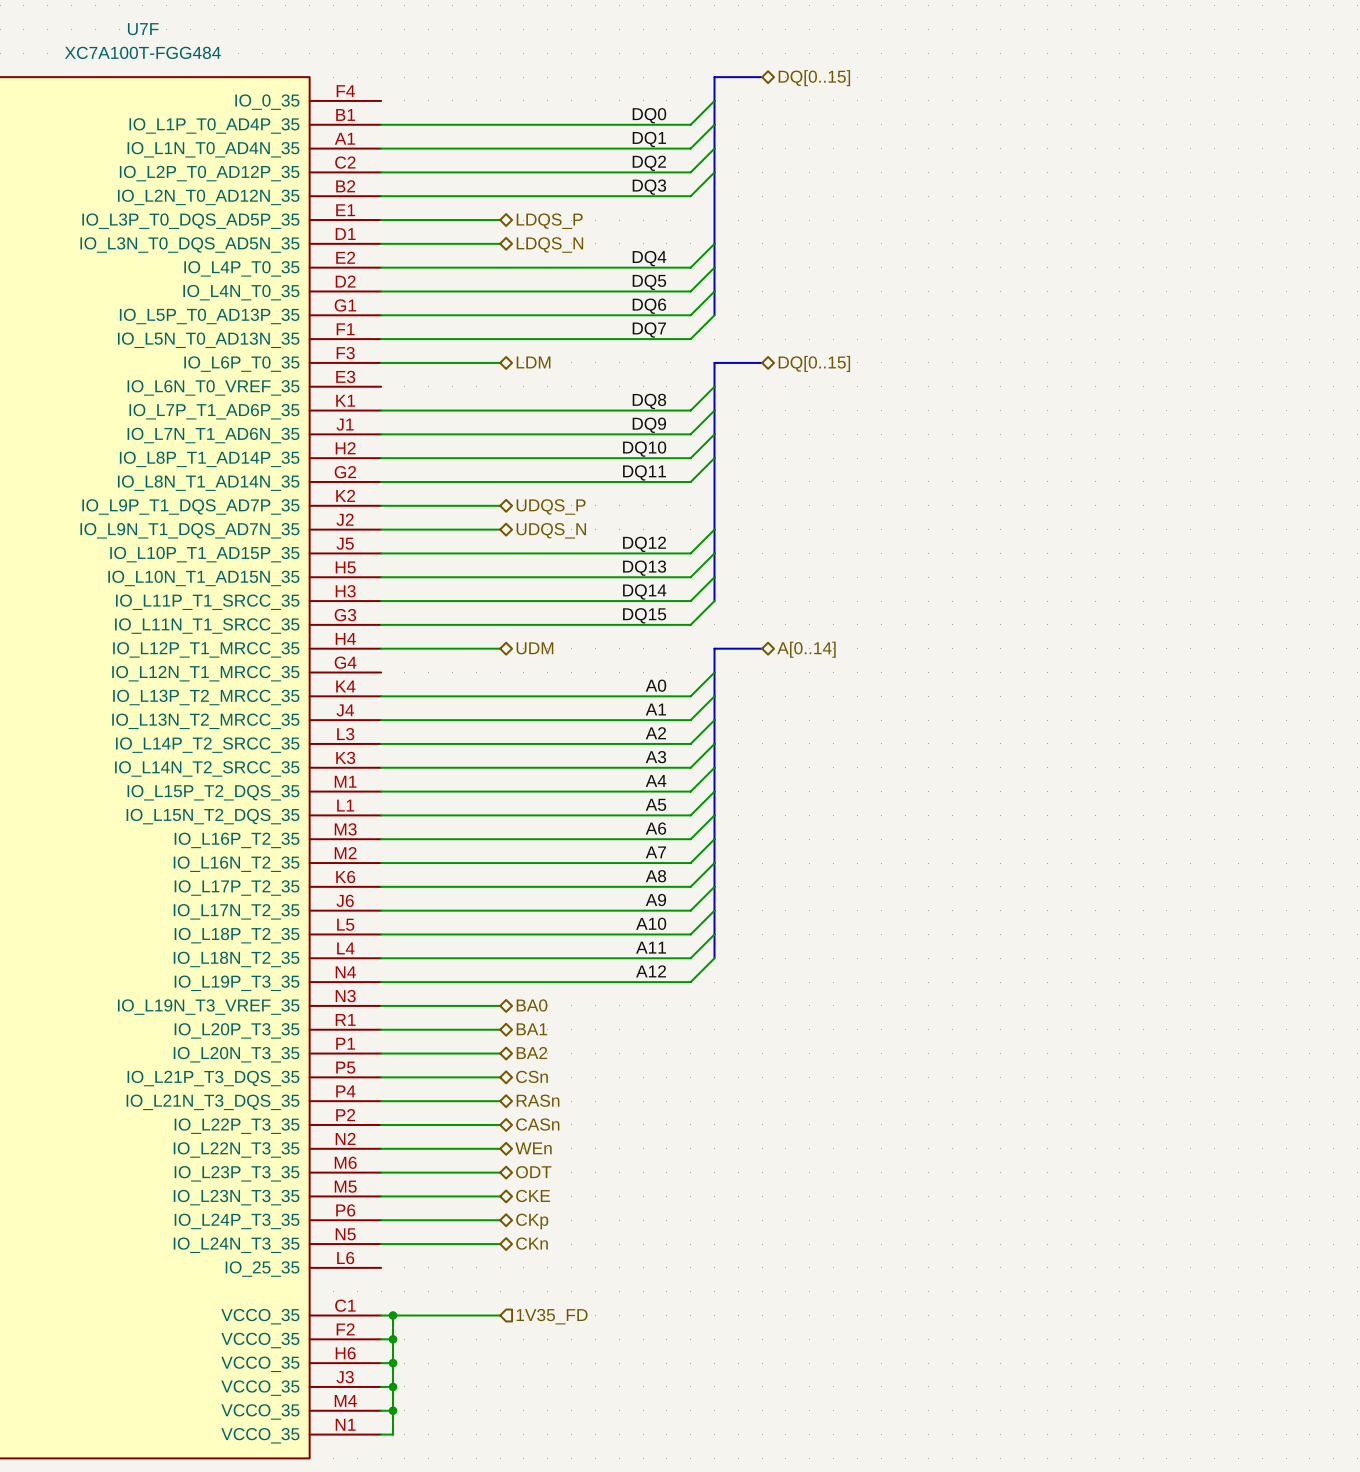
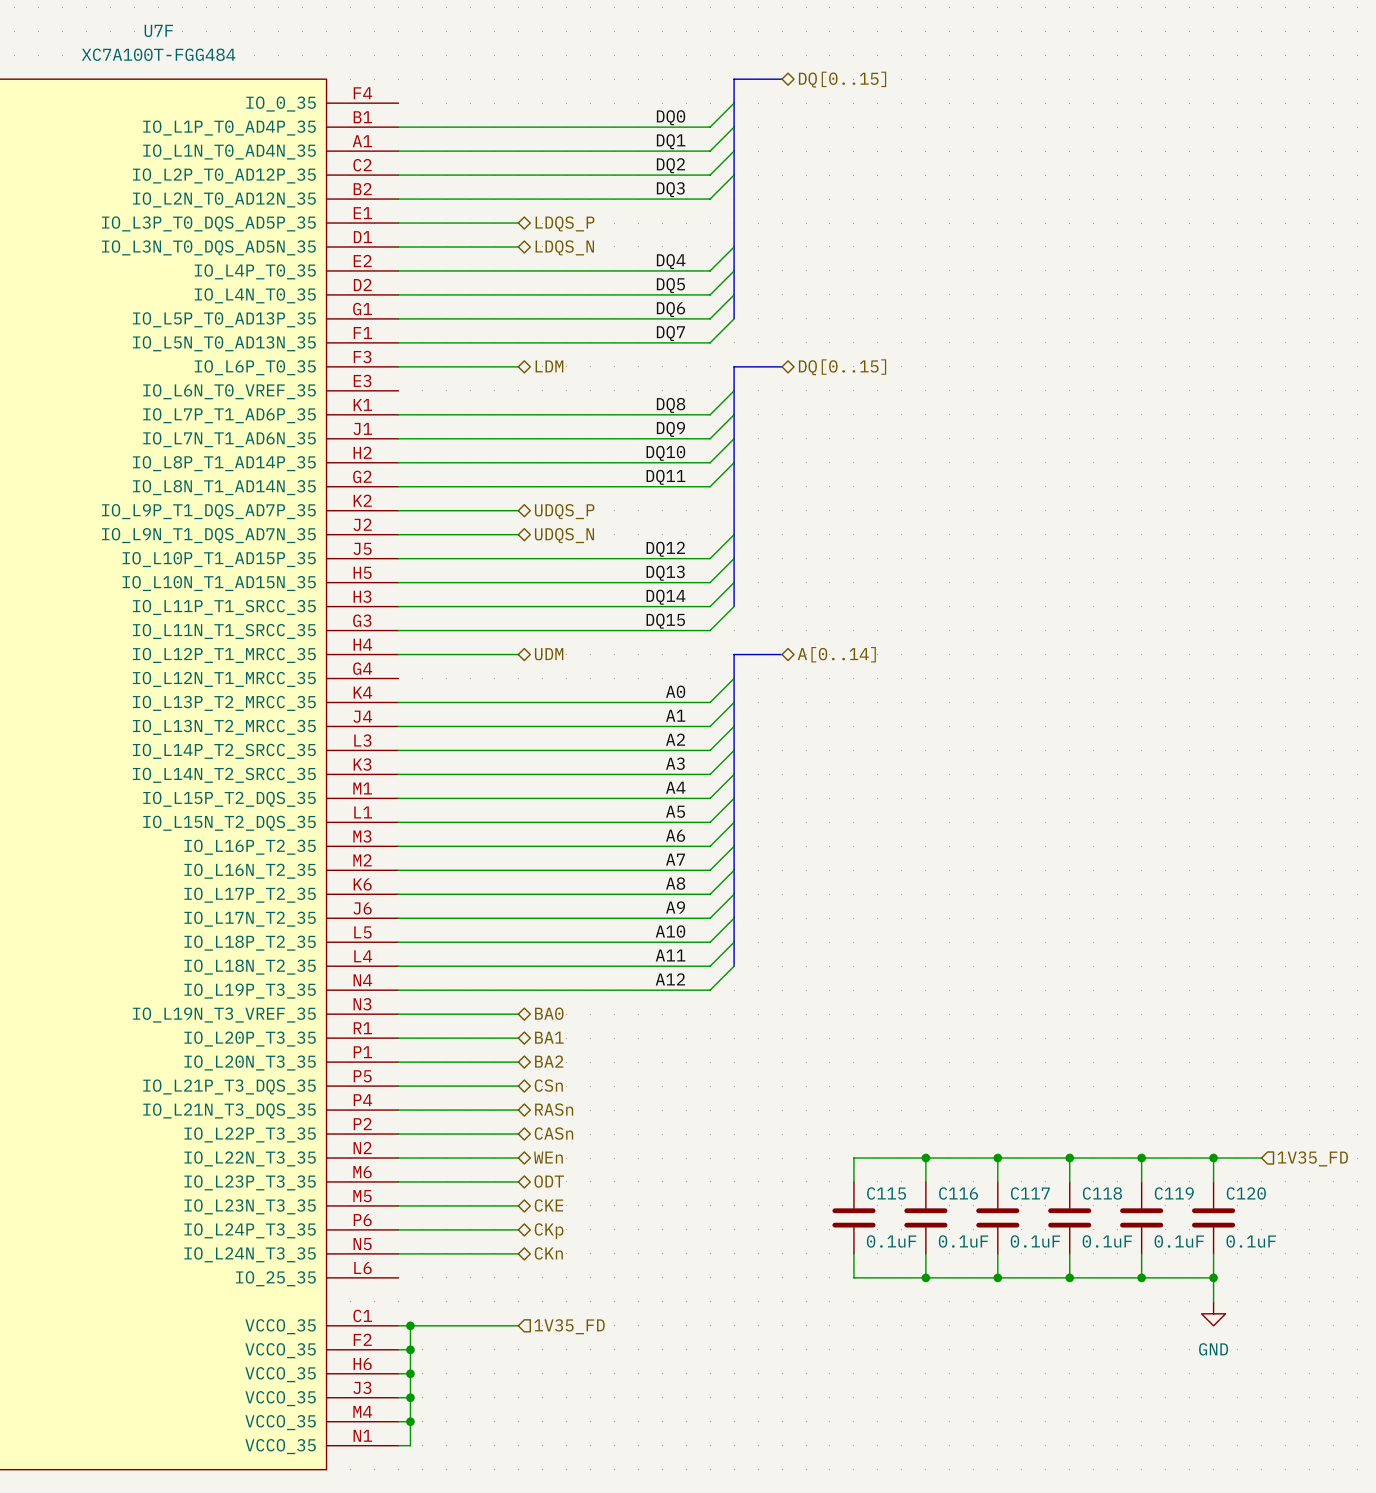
wire: none -> (925, 1158) (925, 1181)
junction: none -> (925, 1158)
wire: none -> (997, 1158) (997, 1181)
junction: none -> (997, 1158)
wire: none -> (1069, 1158) (1069, 1181)
junction: none -> (1069, 1158)
wire: none -> (1141, 1158) (1141, 1181)
junction: none -> (1141, 1158)
wire: none -> (1213, 1158) (1213, 1181)
junction: none -> (1213, 1158)
wire: none -> (1261, 1158) (853, 1158) (853, 1181)
hierarchical label: none -> 1V35_FD (1312, 1158)
C115: none -> 0.1uF (853, 1217)
C116: none -> 0.1uF (925, 1217)
C117: none -> 0.1uF (997, 1217)
C118: none -> 0.1uF (1069, 1217)
C119: none -> 0.1uF (1141, 1217)
C120: none -> 0.1uF (1213, 1217)
wire: none -> (853, 1253) (853, 1277) (1213, 1277)
wire: none -> (925, 1253) (925, 1277)
wire: none -> (997, 1253) (997, 1277)
wire: none -> (1069, 1253) (1069, 1277)
wire: none -> (1141, 1253) (1141, 1277)
wire: none -> (1213, 1253) (1213, 1301)
junction: none -> (925, 1277)
junction: none -> (997, 1277)
junction: none -> (1069, 1277)
junction: none -> (1141, 1277)
junction: none -> (1213, 1277)
power symbol: none -> GND (1213, 1313)

